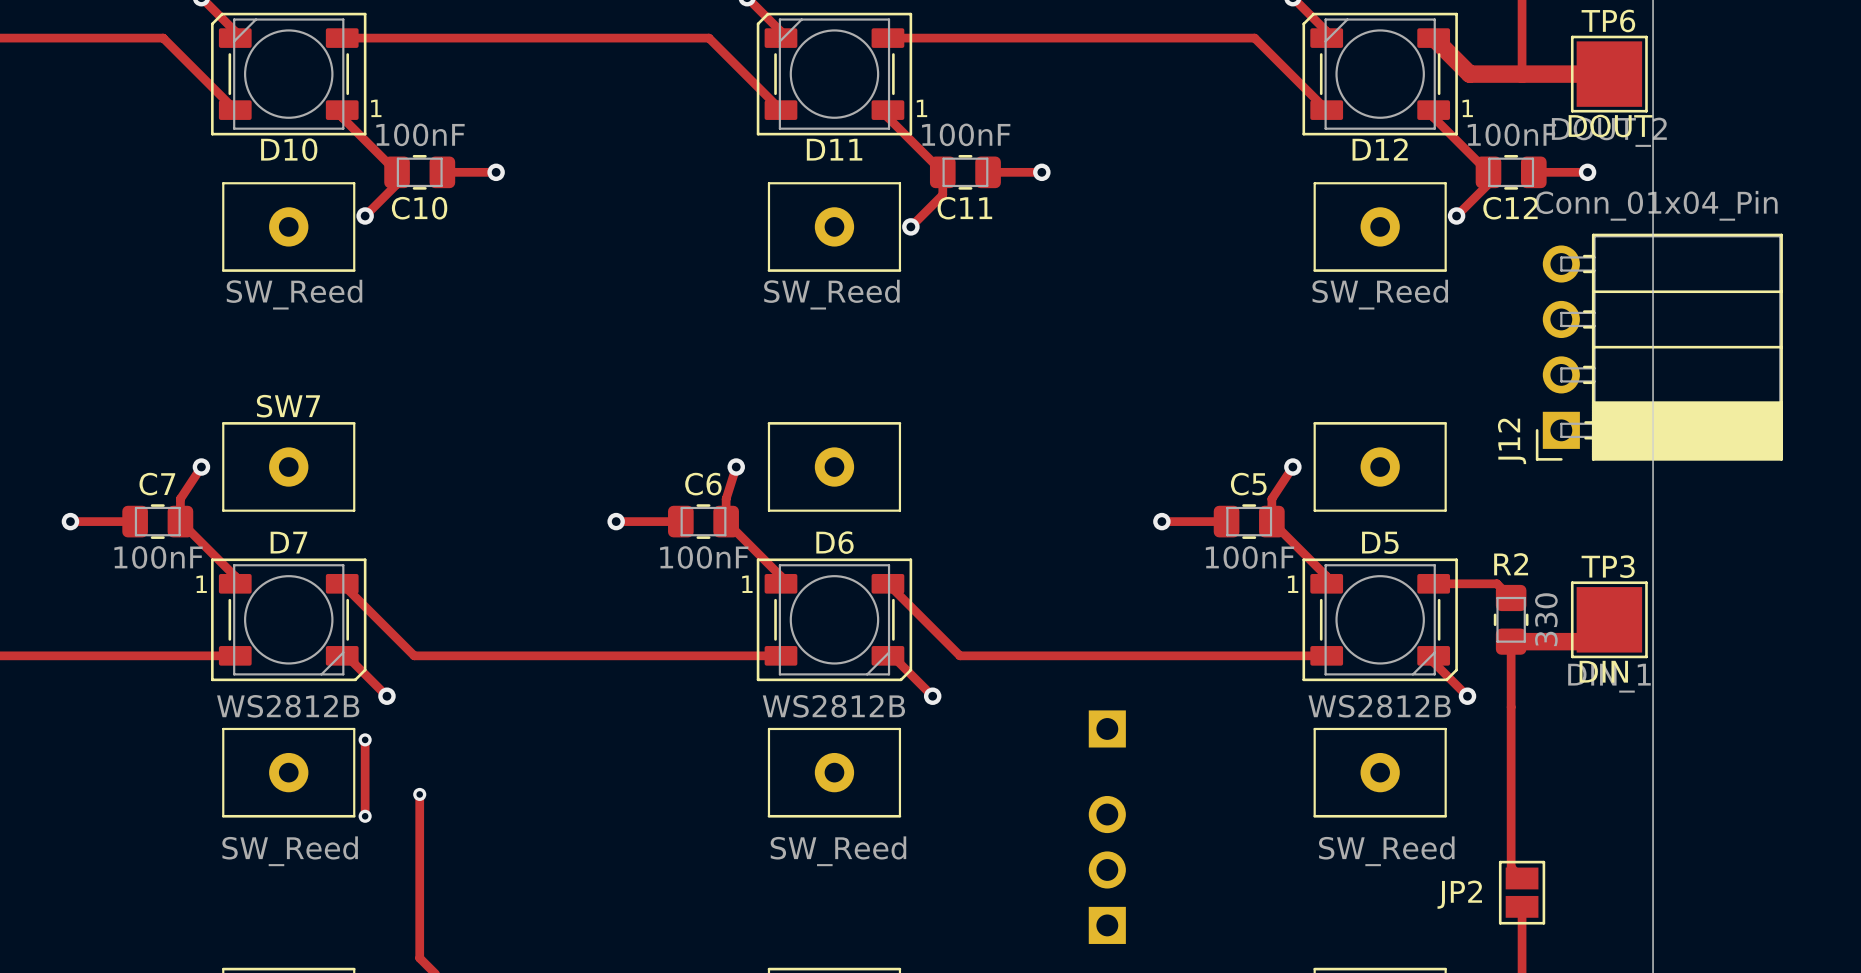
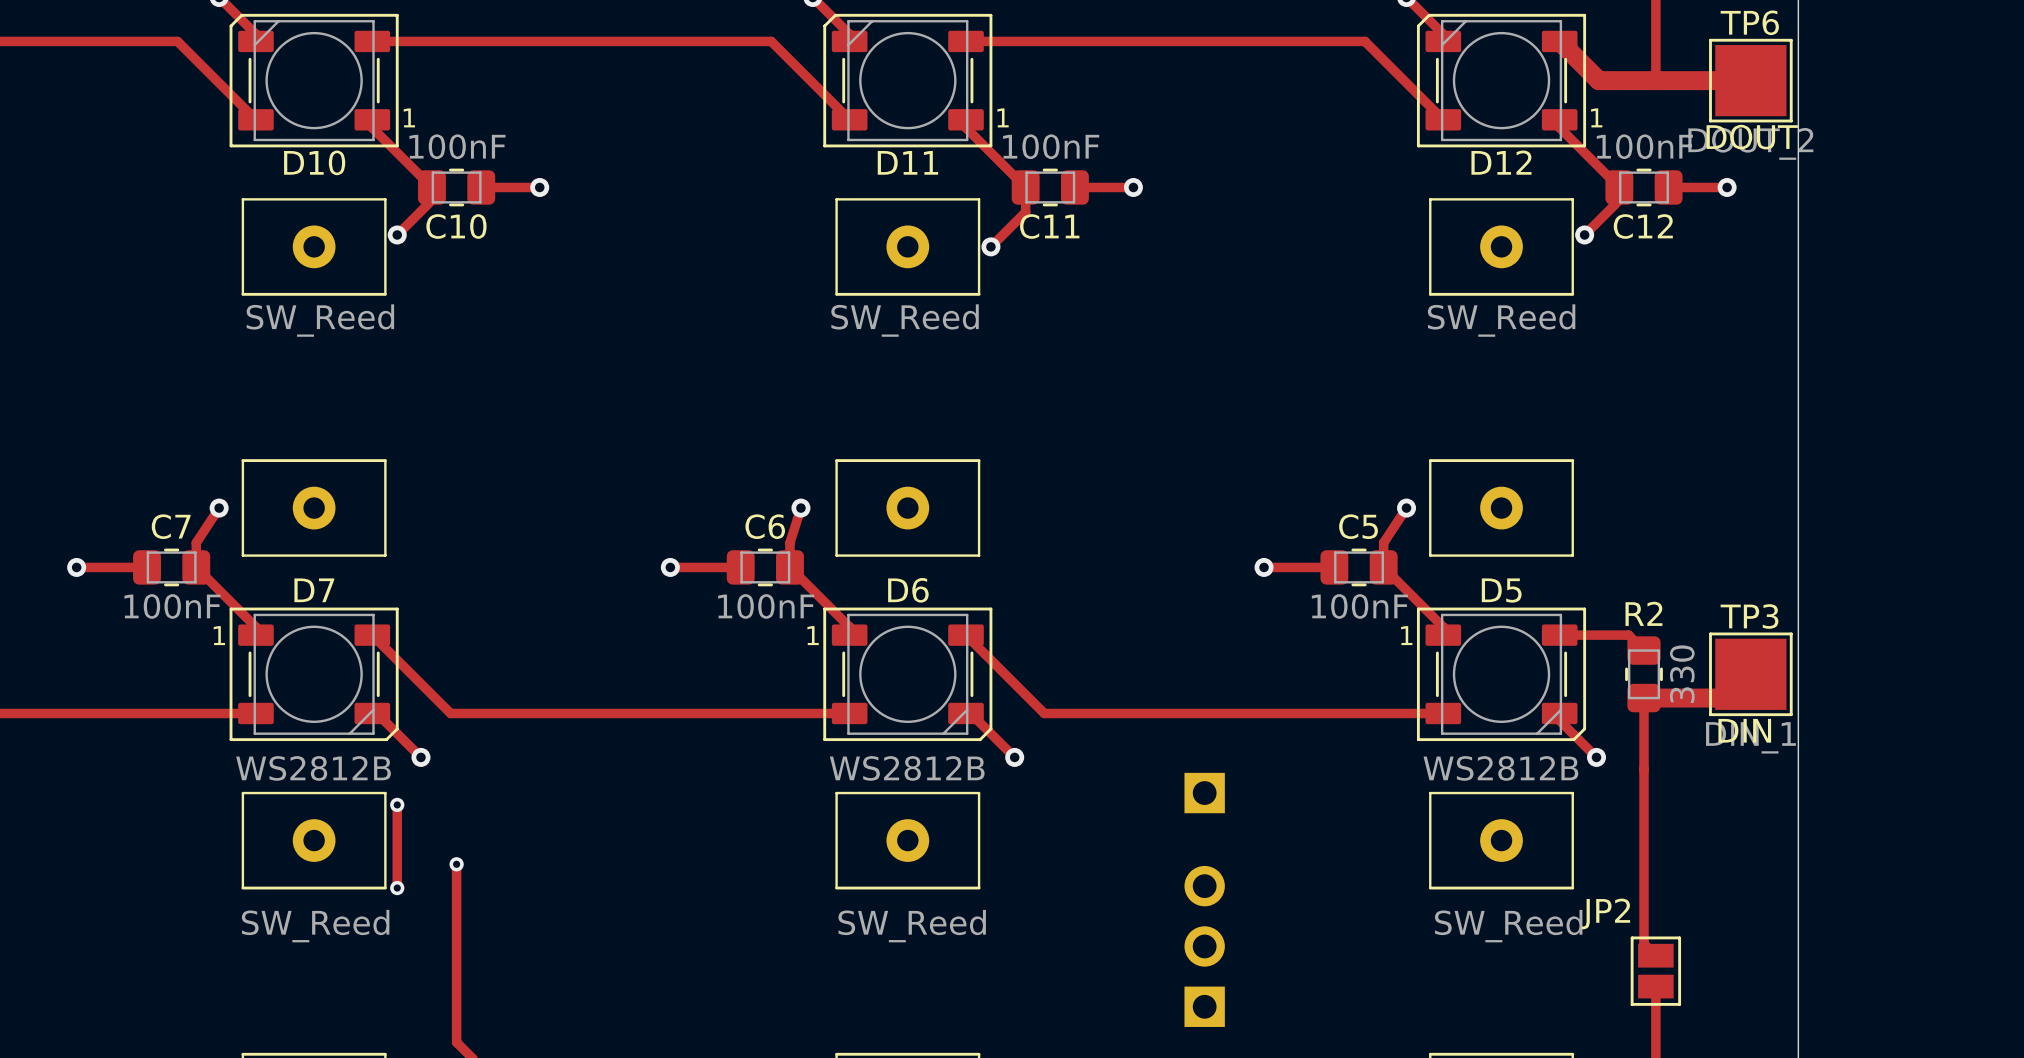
J12: Conn_01x04_Pin (1659, 347) -> none
SW7 name: SW7 (288, 406) -> none
JP2 name position: JP2 (1459, 894) -> JP2 (1605, 913)

